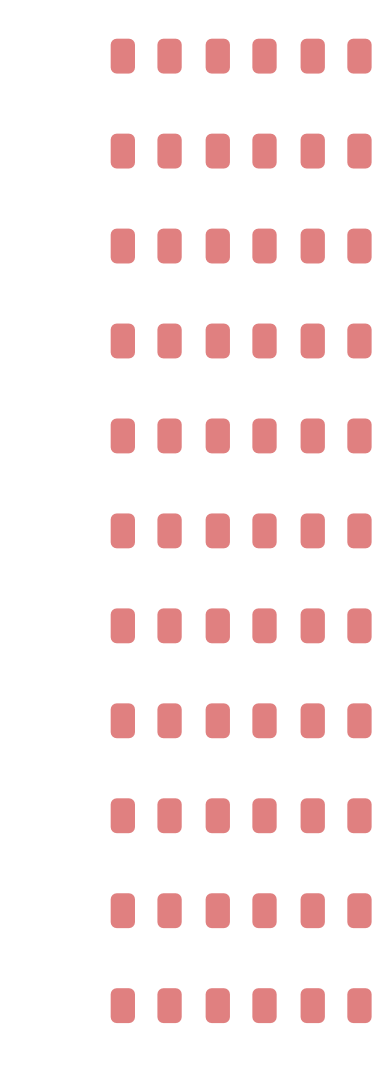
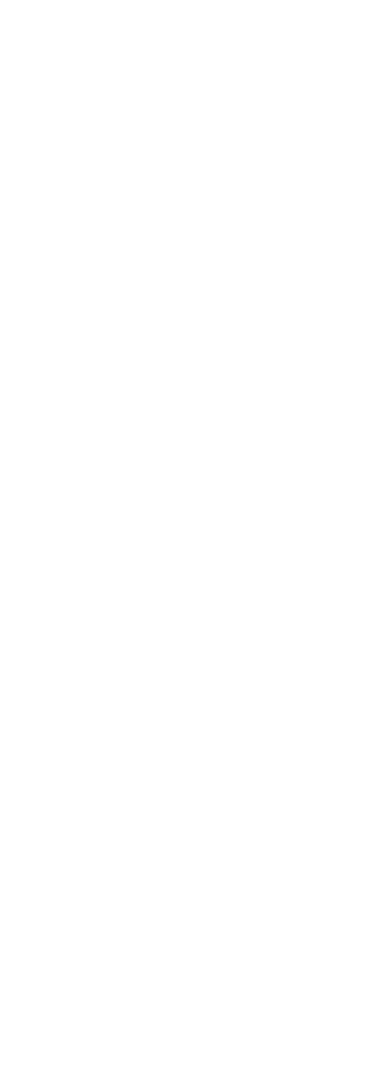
part: (146, 56) -> none
part: (241, 56) -> none
part: (336, 56) -> none
part: (146, 151) -> none
part: (241, 151) -> none
part: (336, 151) -> none
part: (146, 246) -> none
part: (241, 246) -> none
part: (336, 246) -> none
part: (146, 340) -> none
part: (241, 340) -> none
part: (336, 340) -> none
part: (146, 435) -> none
part: (241, 435) -> none
part: (336, 435) -> none
part: (146, 530) -> none
part: (241, 530) -> none
part: (336, 530) -> none
part: (146, 625) -> none
part: (241, 625) -> none
part: (336, 625) -> none
part: (146, 720) -> none
part: (241, 720) -> none
part: (336, 720) -> none
part: (146, 815) -> none
part: (241, 815) -> none
part: (336, 815) -> none
part: (146, 910) -> none
part: (241, 910) -> none
part: (336, 910) -> none
part: (146, 1005) -> none
part: (241, 1005) -> none
part: (336, 1005) -> none

